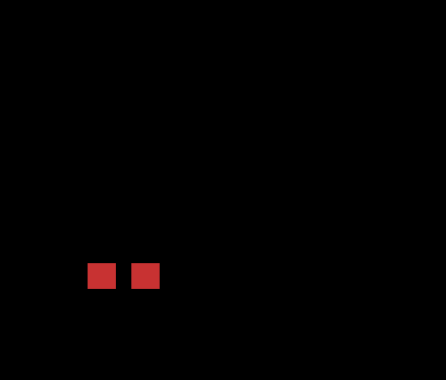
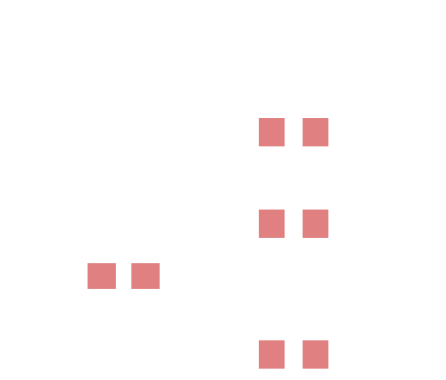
part: none -> (293, 132)
part: none -> (293, 223)
part: none -> (293, 354)

